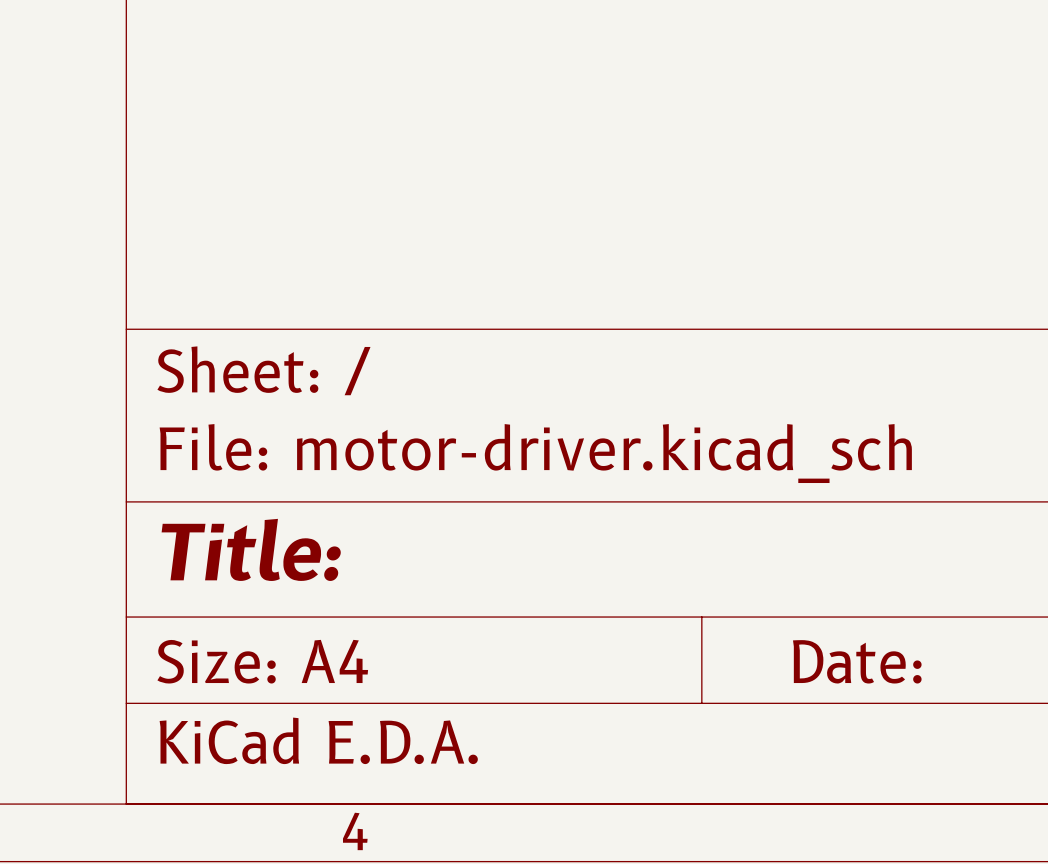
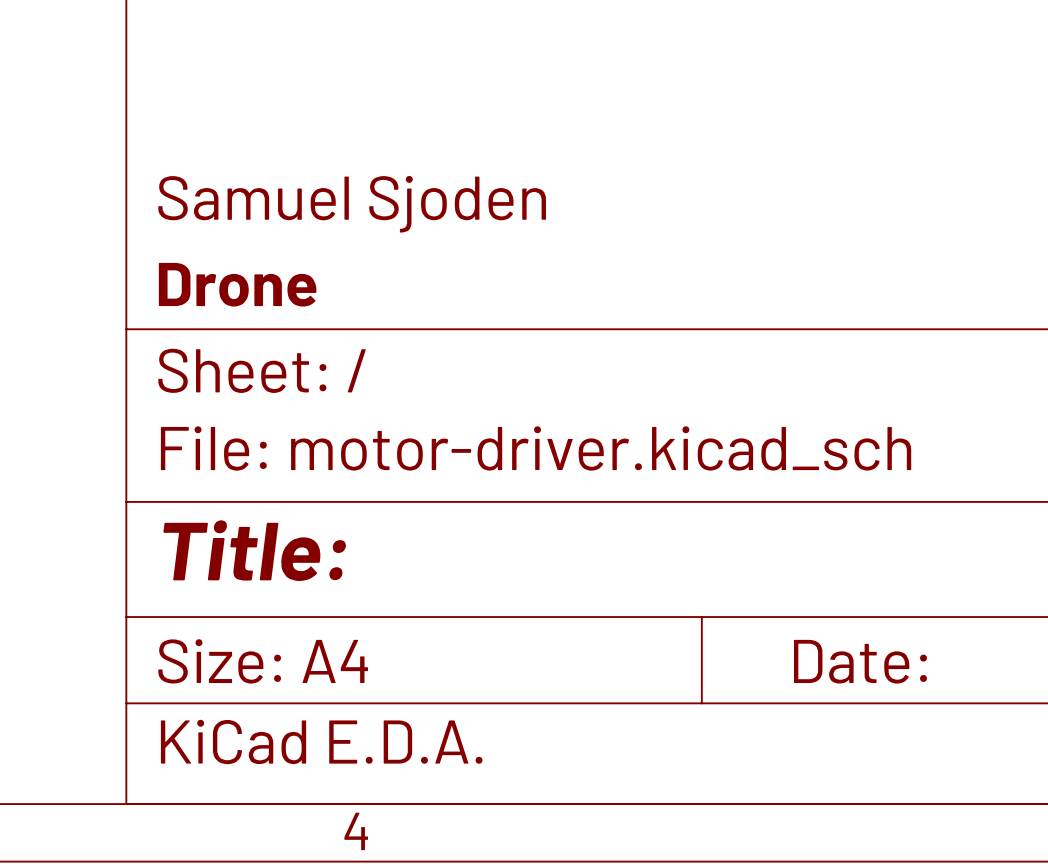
title block: none -> Samuel Sjoden (352, 204)
title block: none -> Drone (237, 284)

